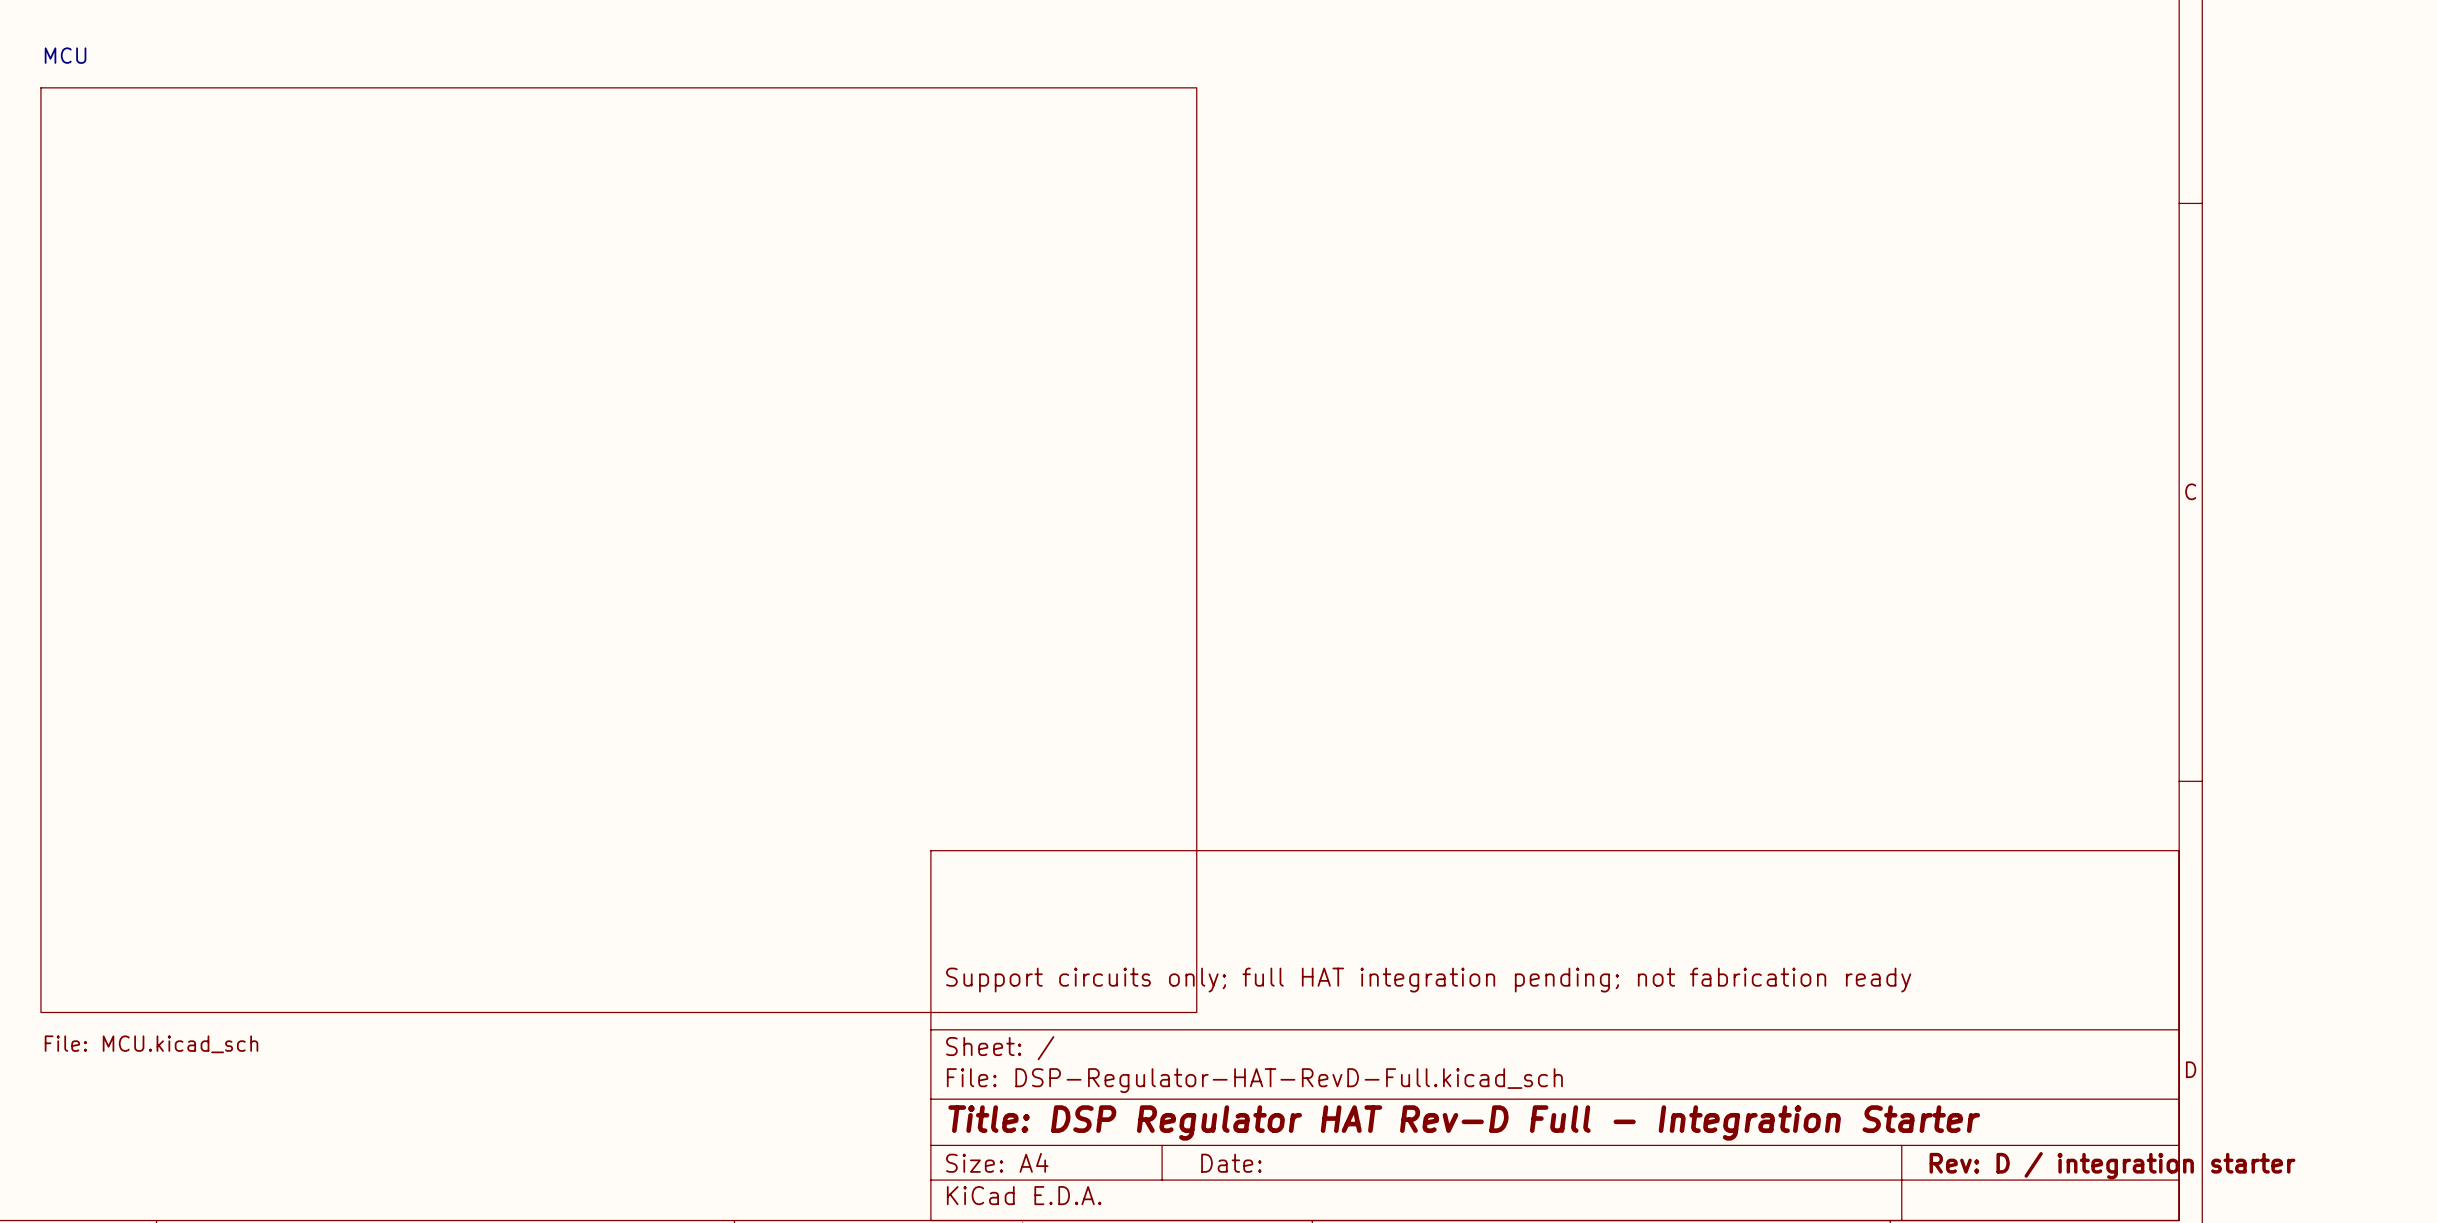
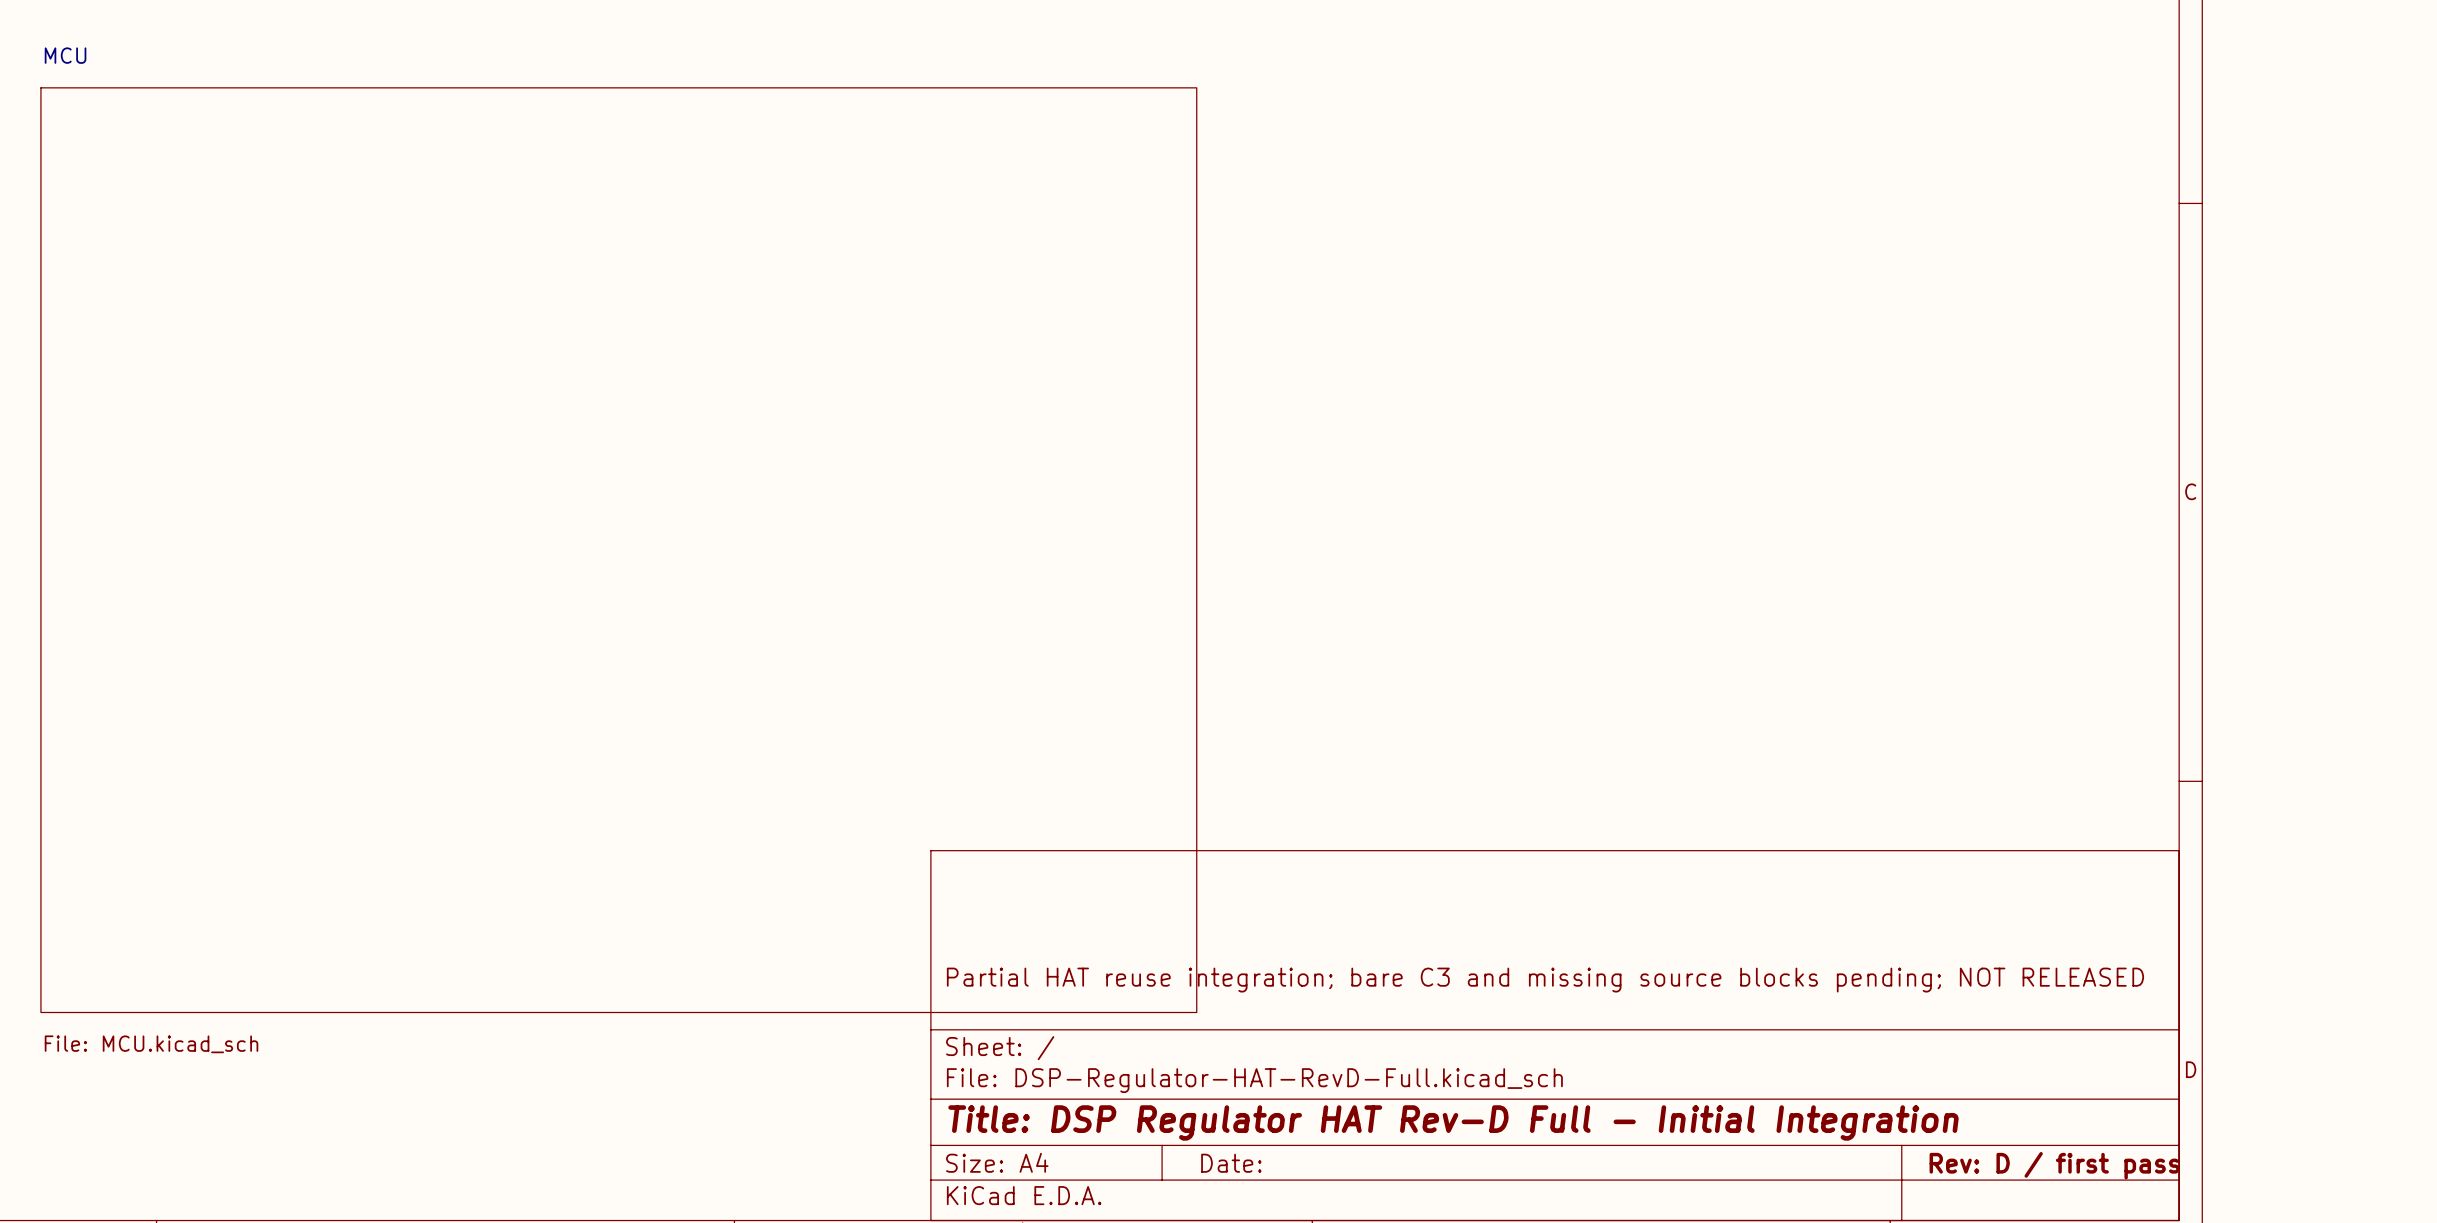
title block: Support circuits only; full HAT integration pending; not fabrication ready (1428, 980) -> Partial HAT reuse integration; bare C3 and missing source blocks pending; NOT RELEASED (1545, 980)
title block: Title: DSP Regulator HAT Rev-D Full - Integration Starter (1464, 1122) -> Title: DSP Regulator HAT Rev-D Full - Initial Integration (1453, 1122)
title block: Rev: D / integration starter (2112, 1165) -> Rev: D / first pass (2054, 1165)

